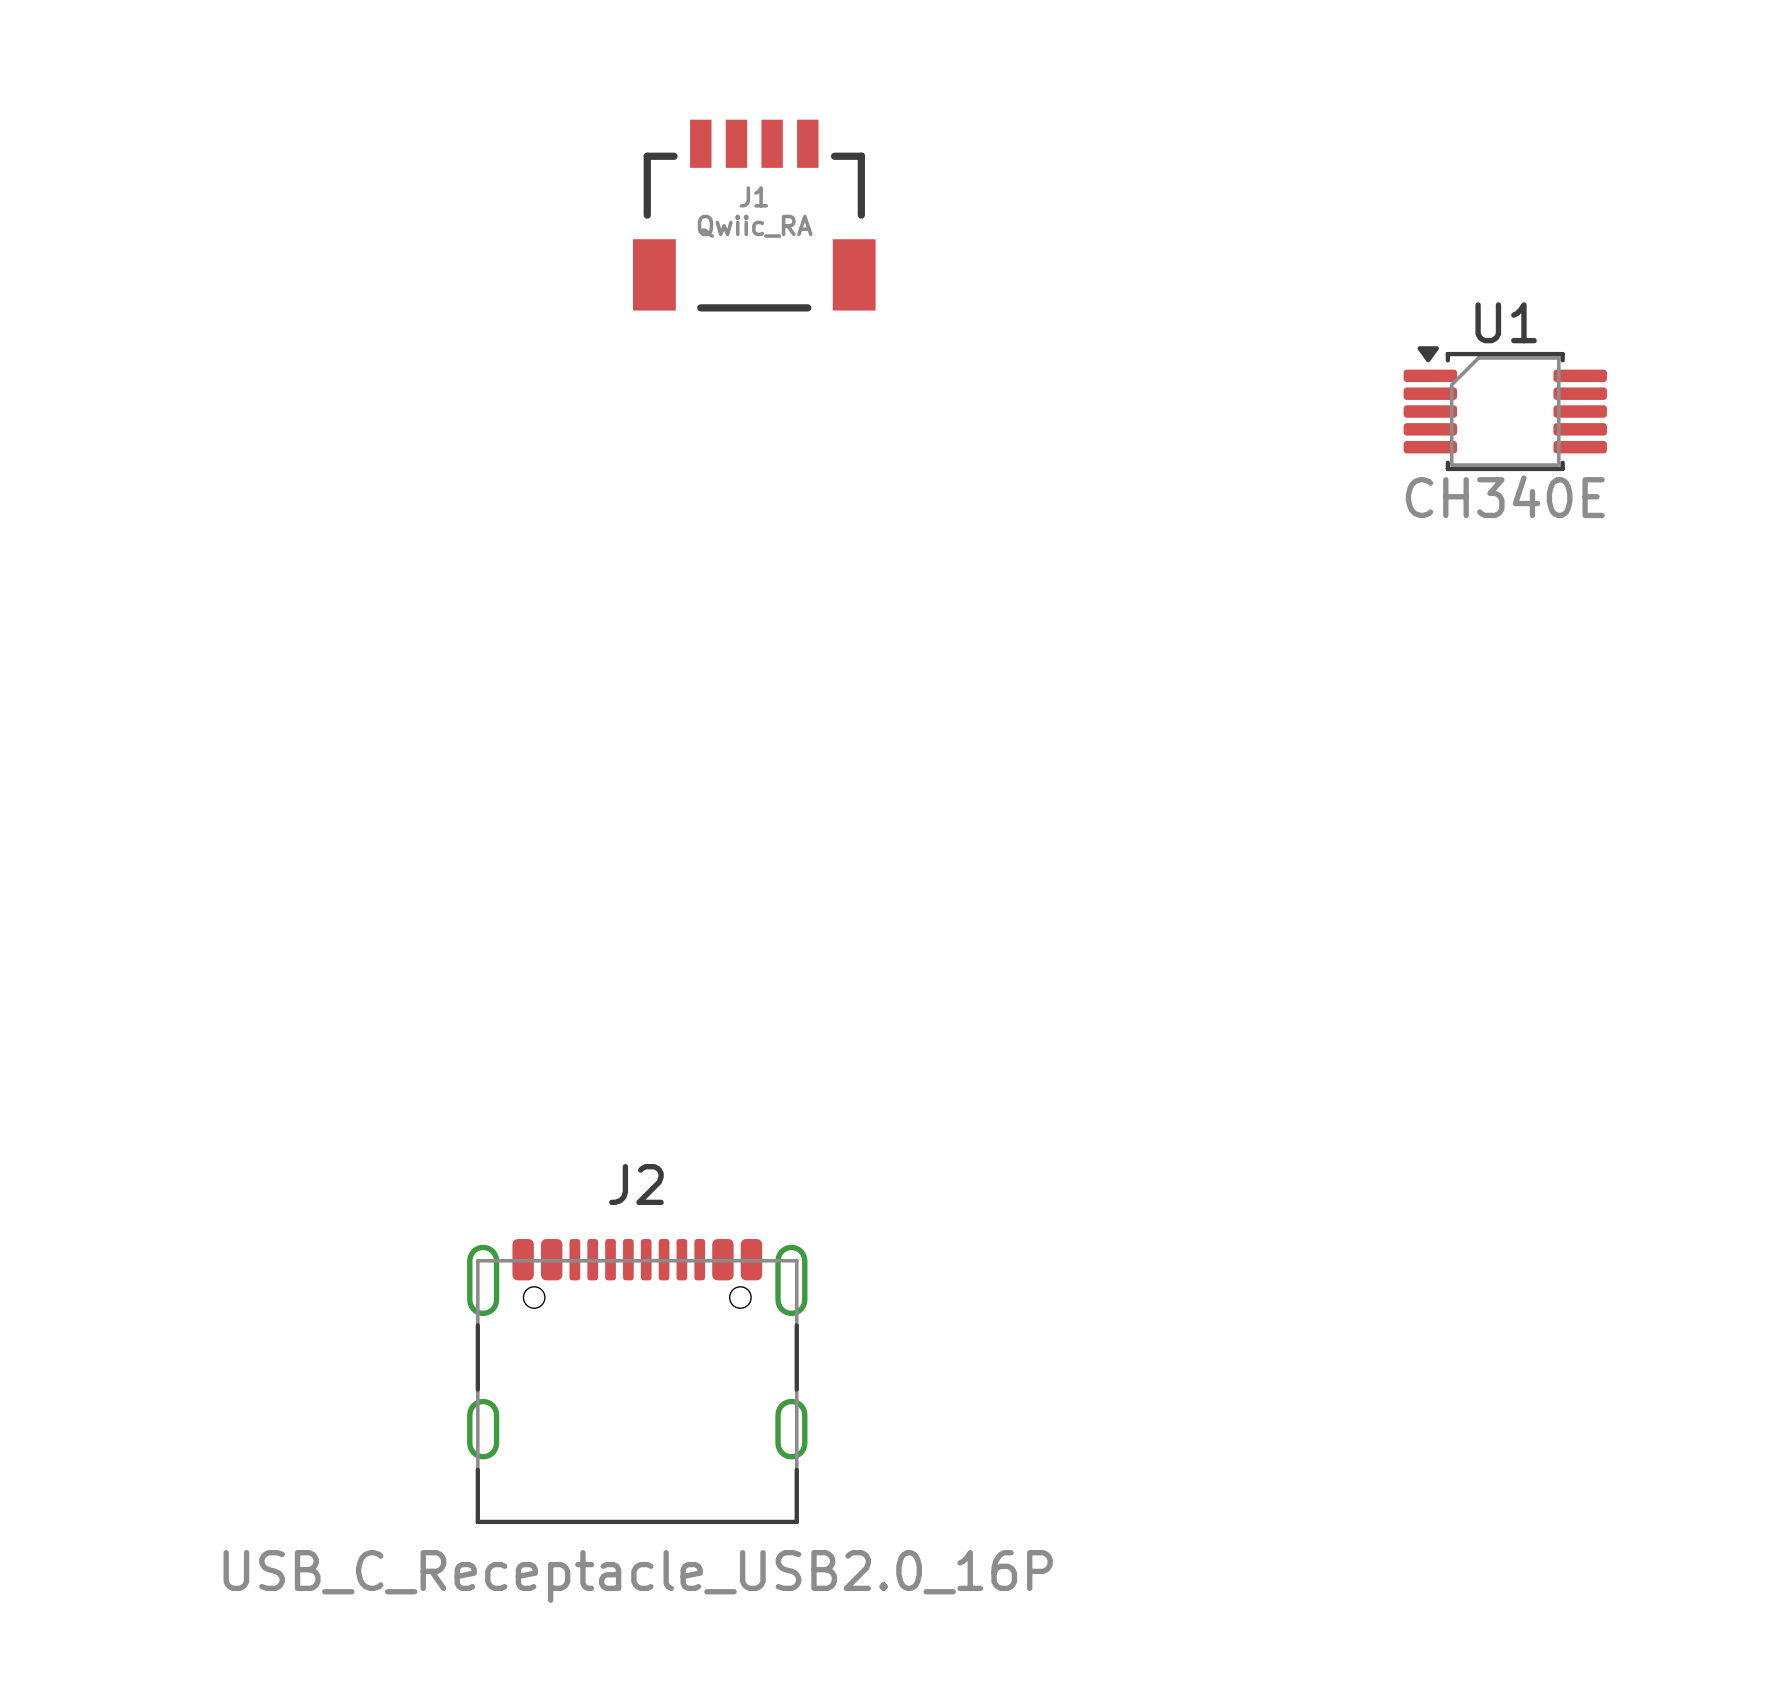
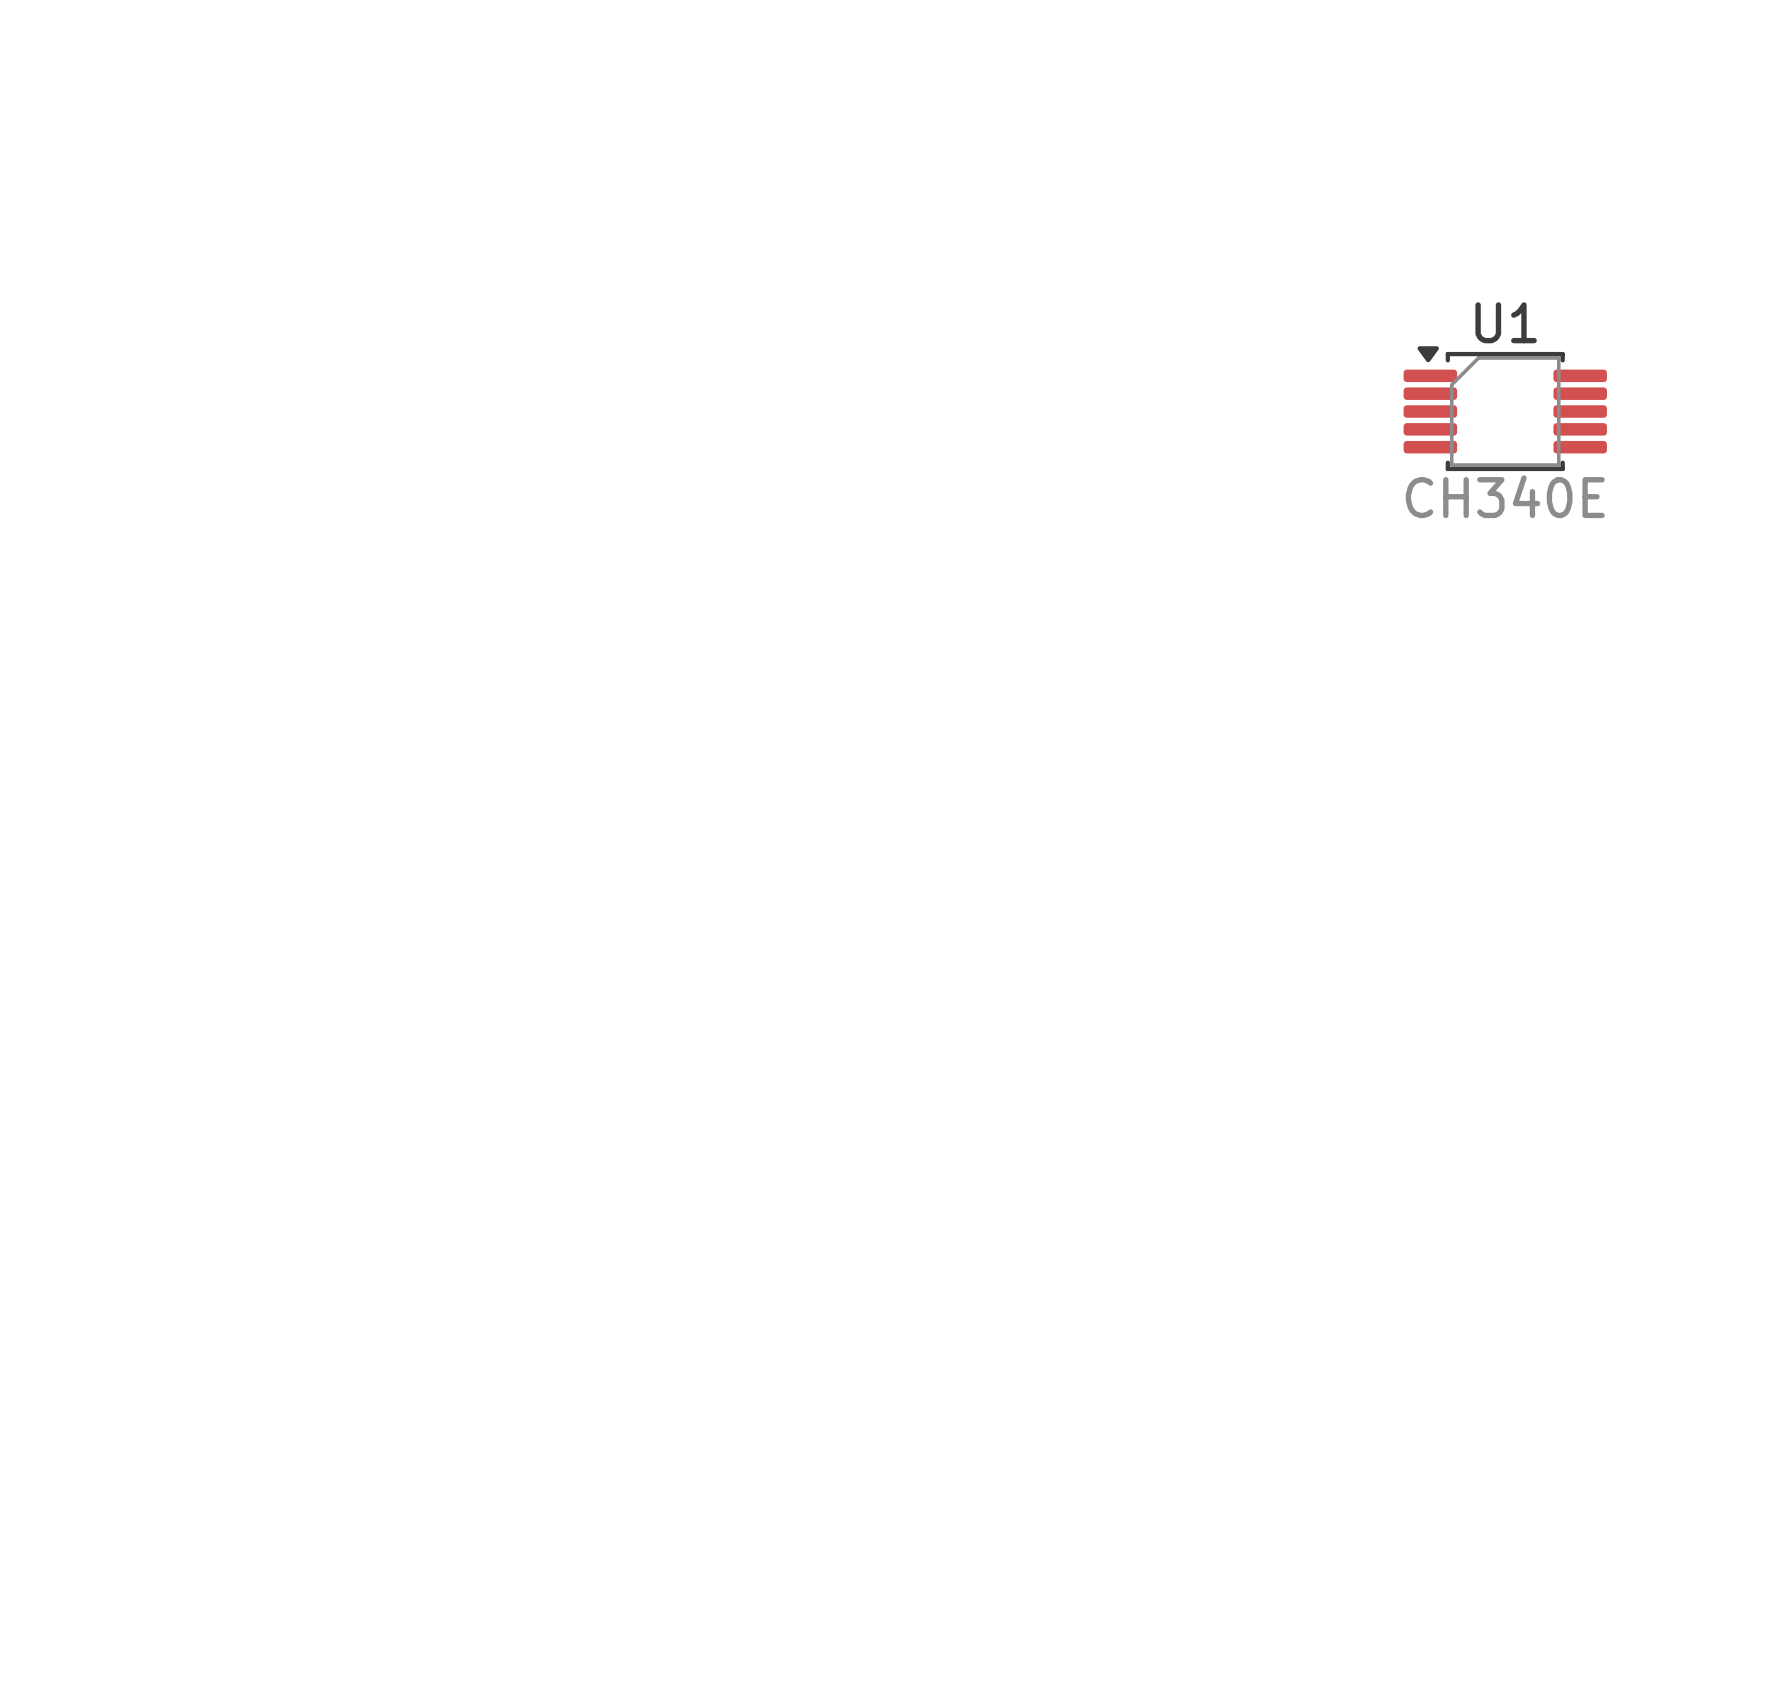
J1: Qwiic_RA (754, 215) -> none
J2: USB_C_Receptacle_USB2.0_16P (637, 1381) -> none

